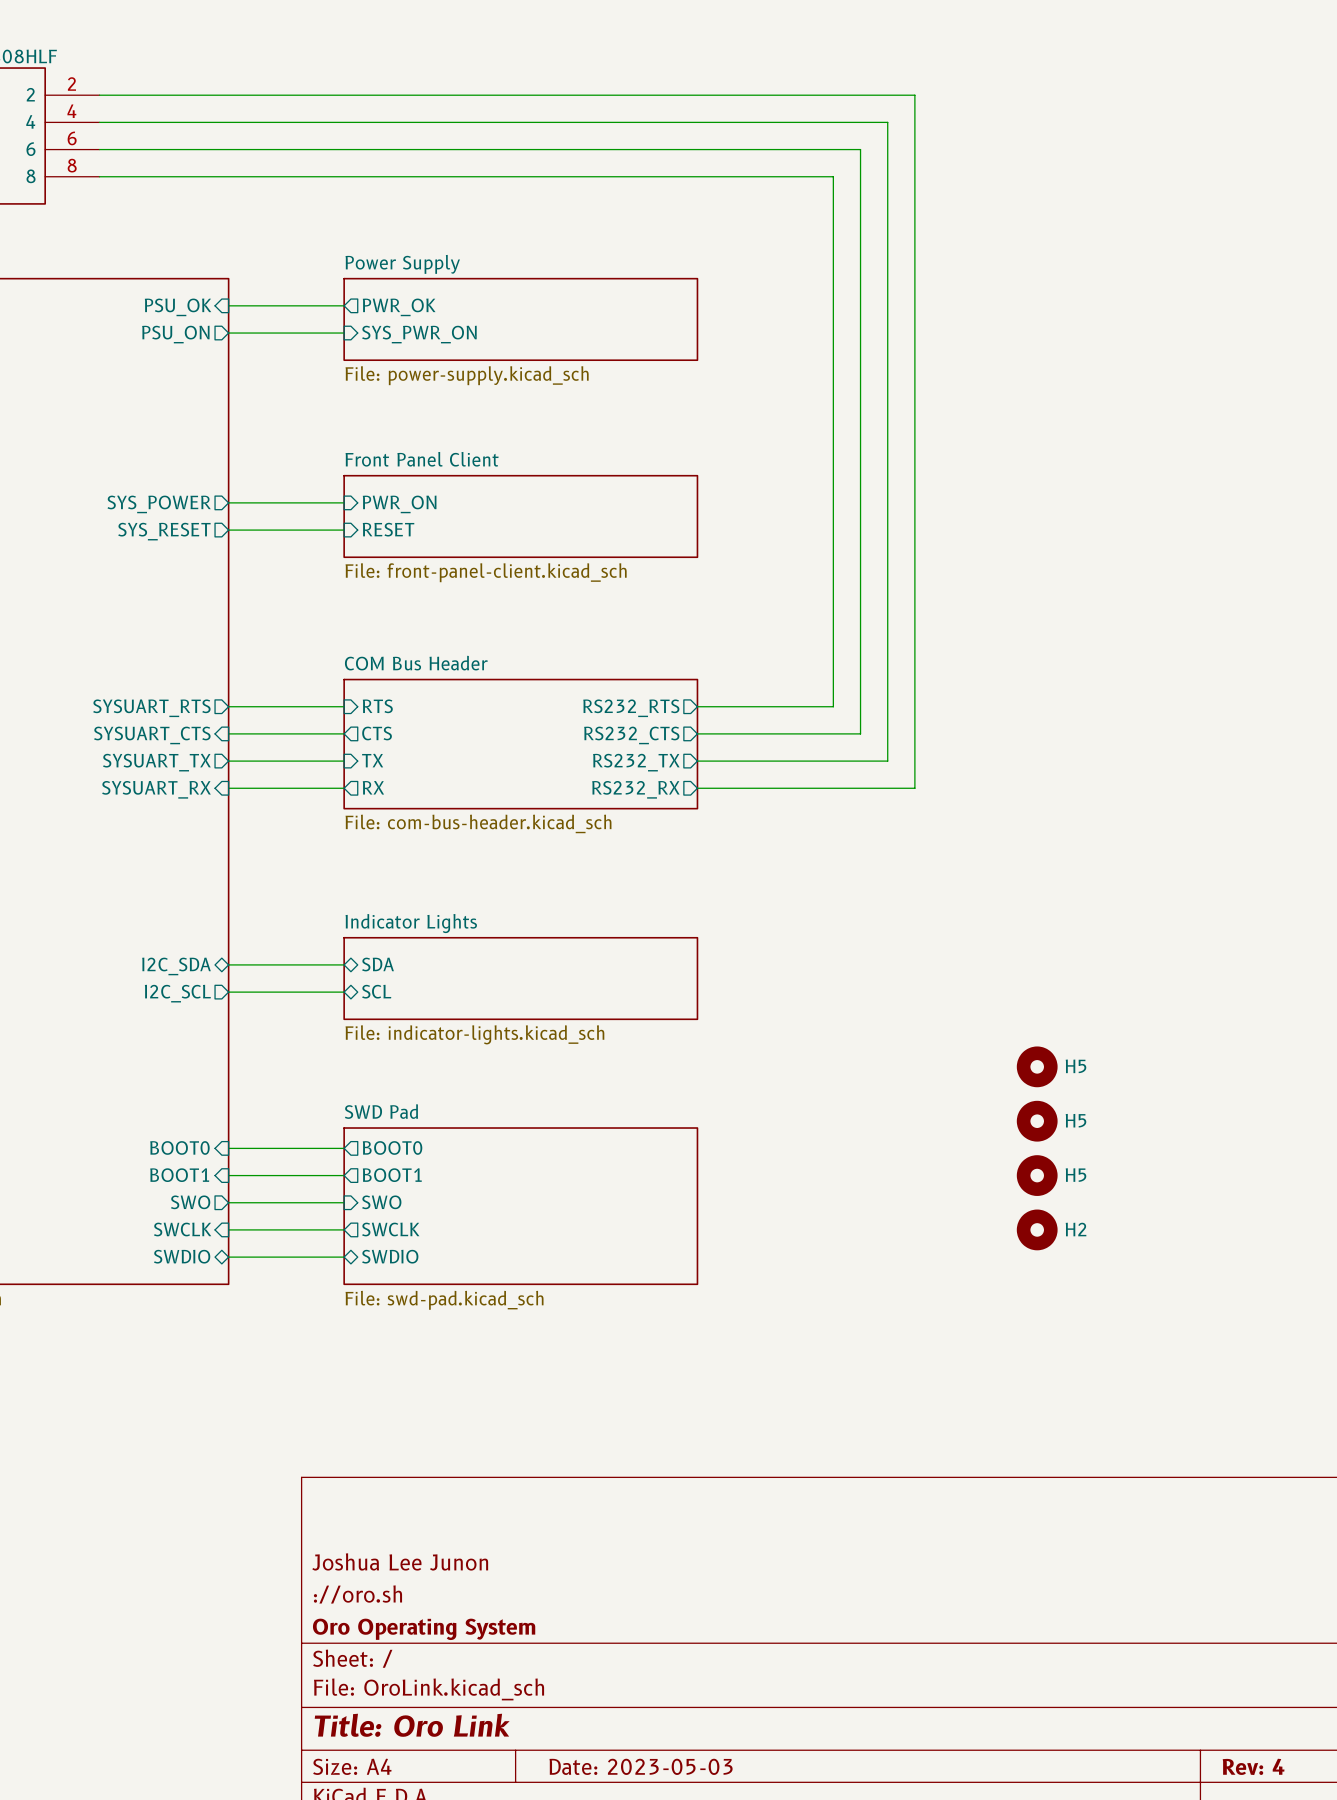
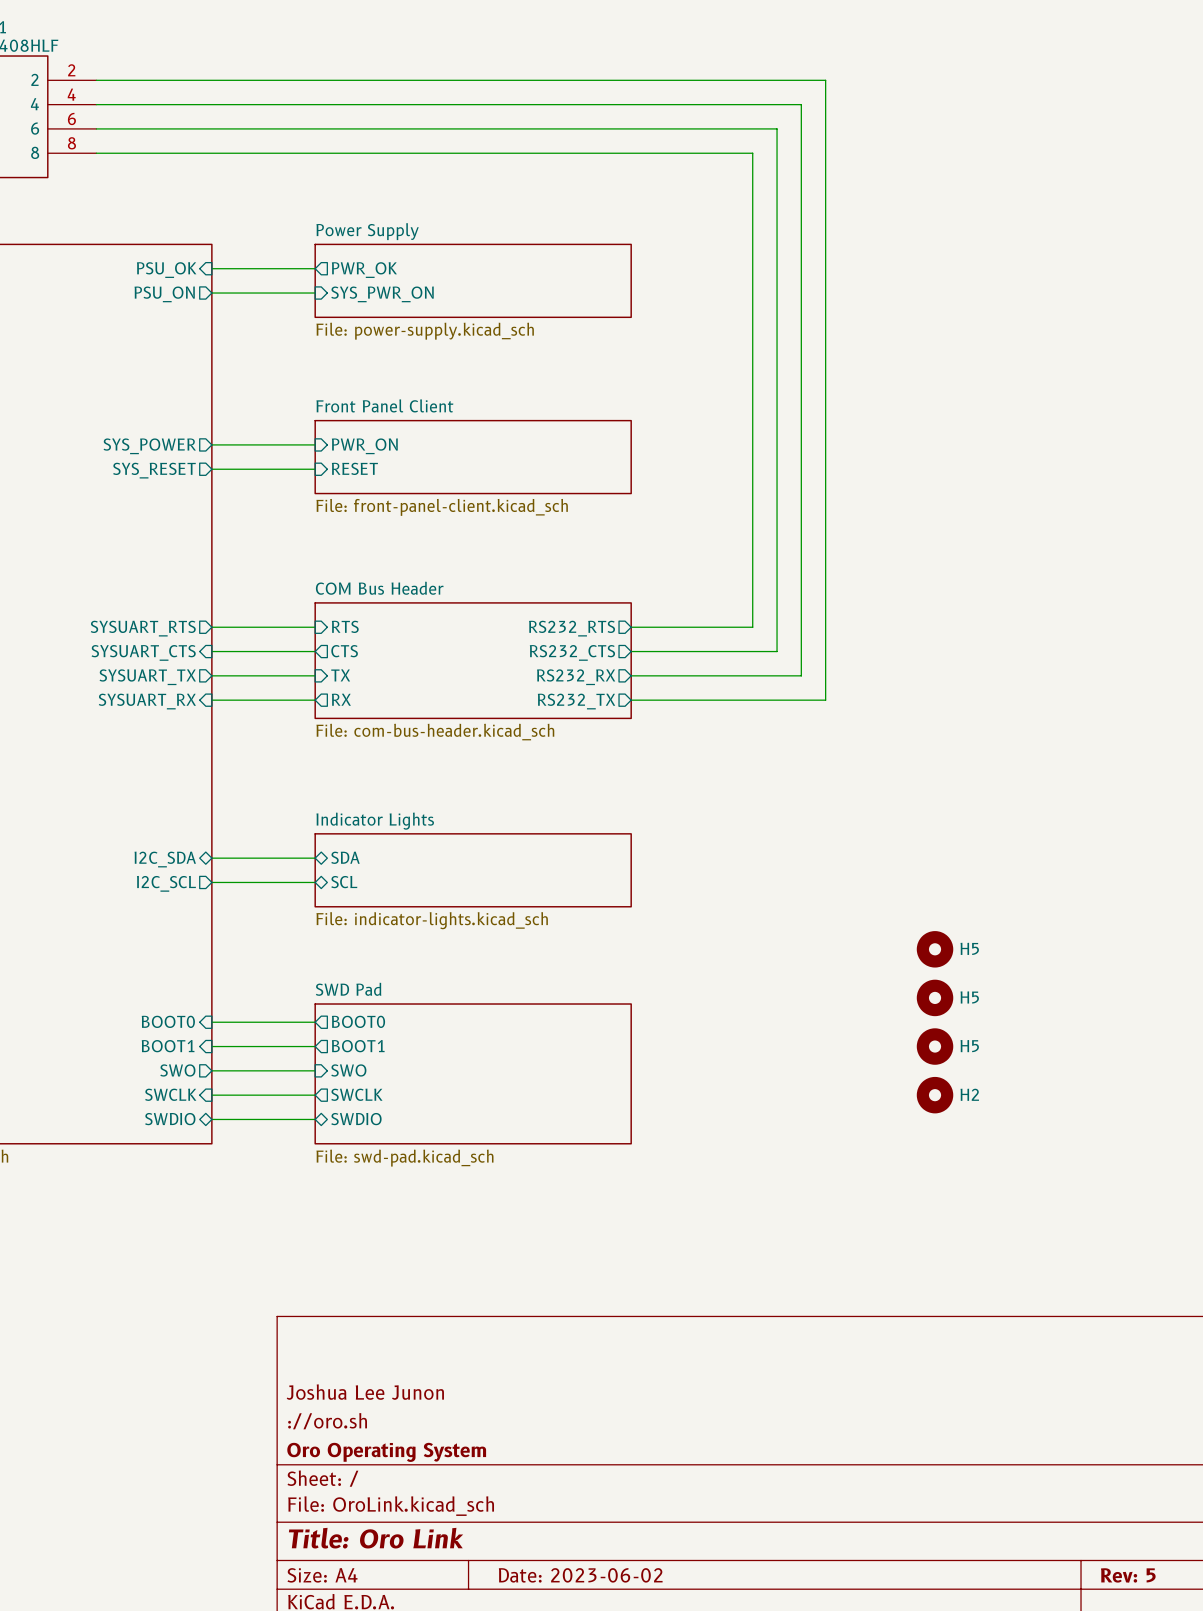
sheet pin: RS232_TX (636, 762) -> RS232_RX (576, 677)
sheet pin: RS232_RX (635, 789) -> RS232_TX (576, 701)
title block: Date: 2023-05-03 (641, 1766) -> Date: 2023-06-02 (580, 1575)
title block: Rev: 4 (1253, 1766) -> Rev: 5 (1128, 1575)

